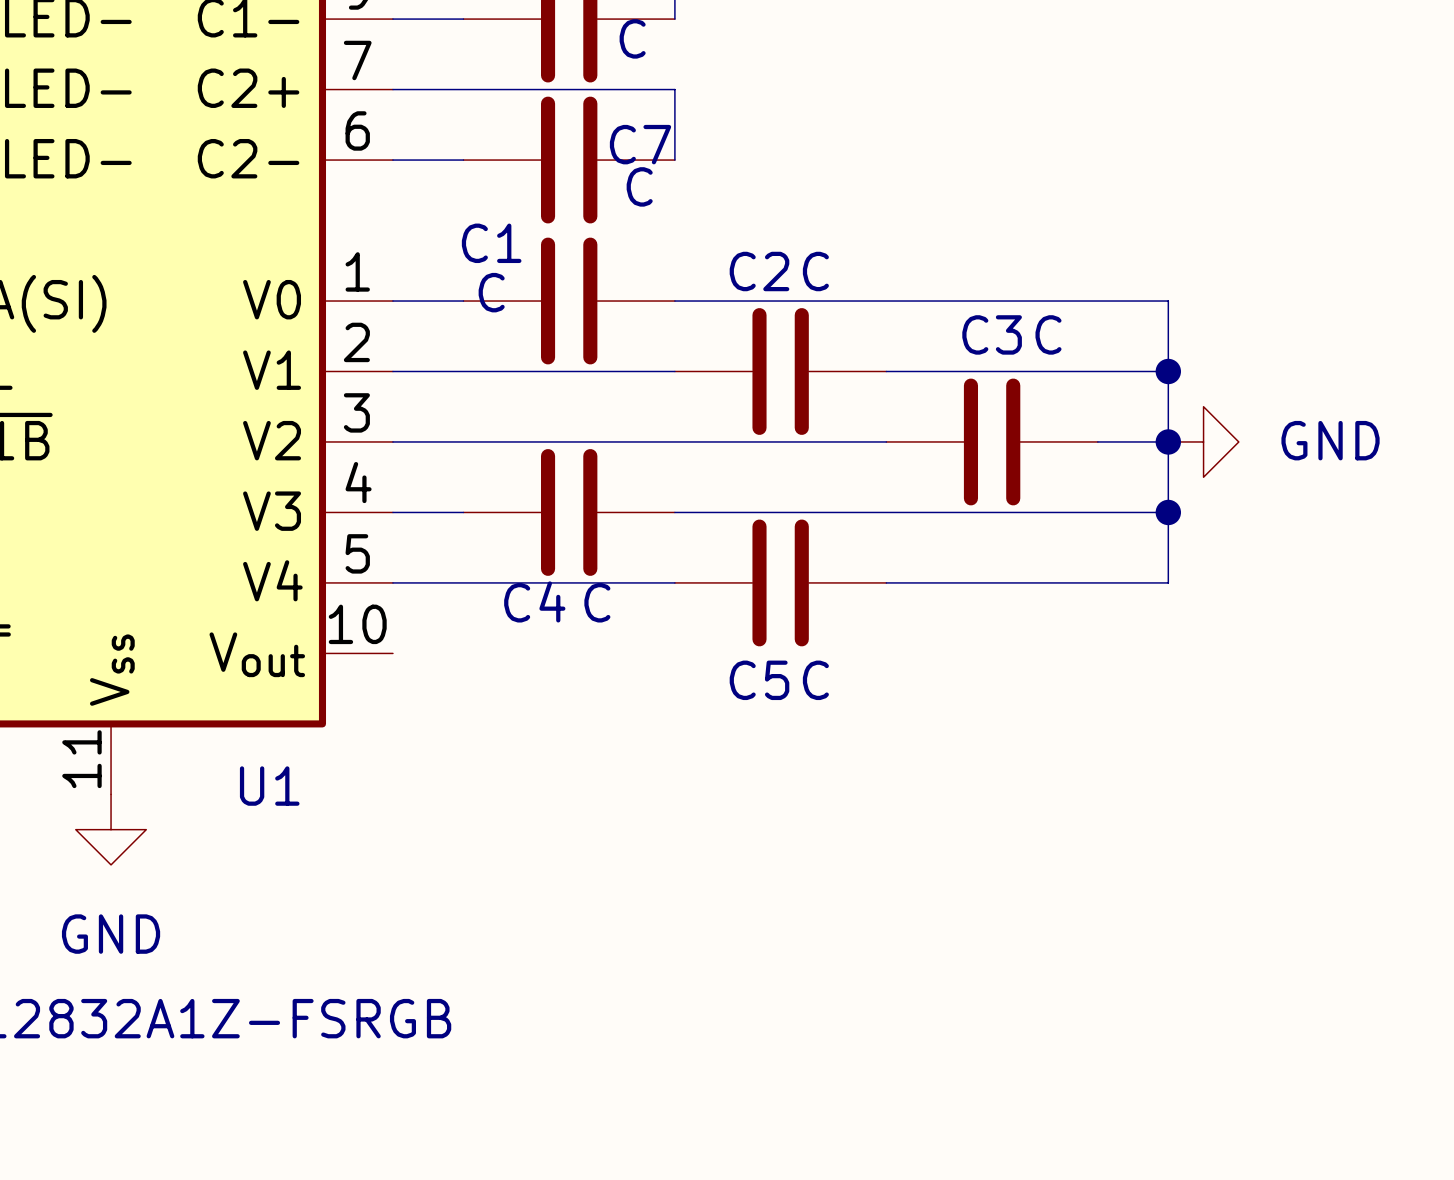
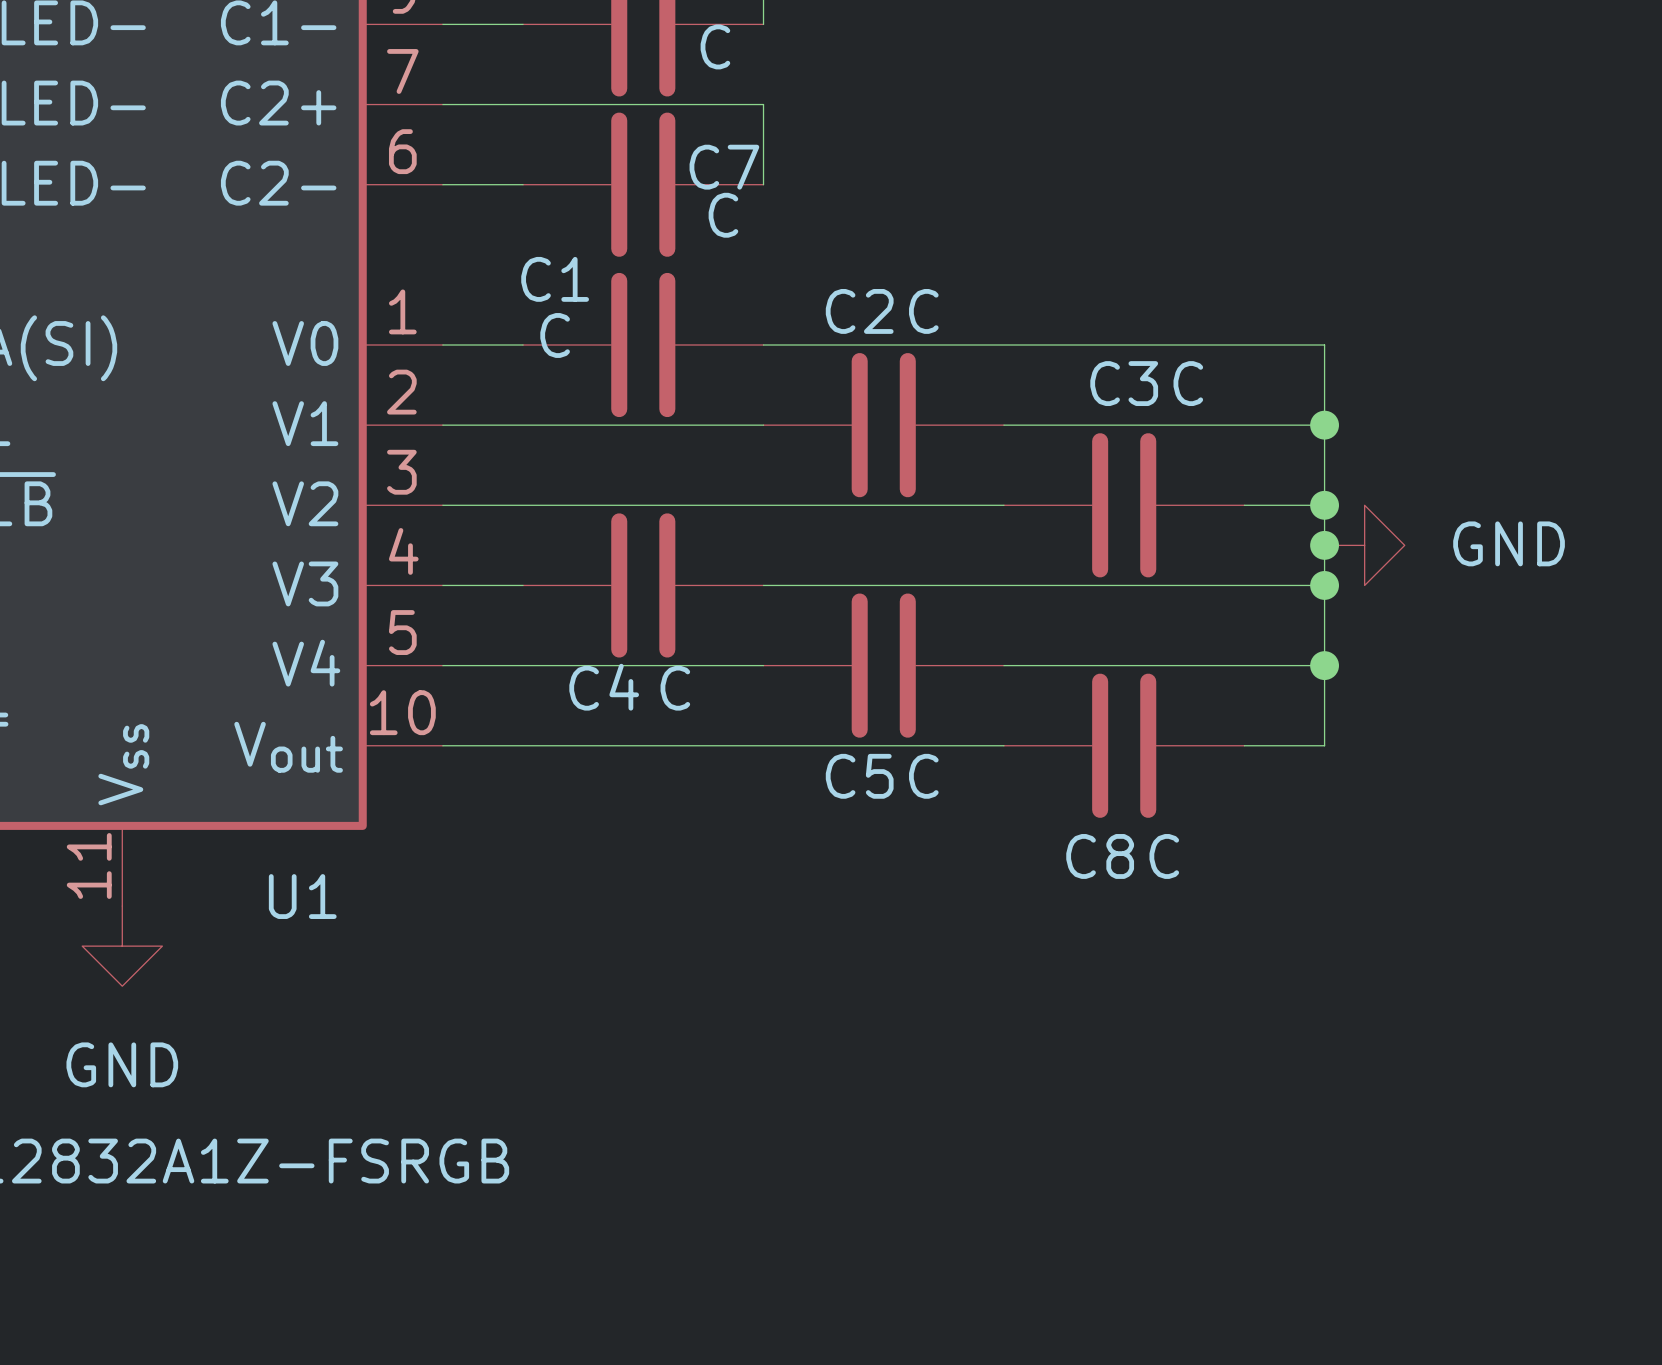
power symbol position: GND (1203, 441) -> GND (1364, 545)
junction: none -> (1324, 545)
wire: none -> (1324, 665) (1324, 745) (1244, 745)
junction: none -> (1324, 665)
wire: none -> (442, 745) (1003, 745)
C8: none -> C (1124, 745)

